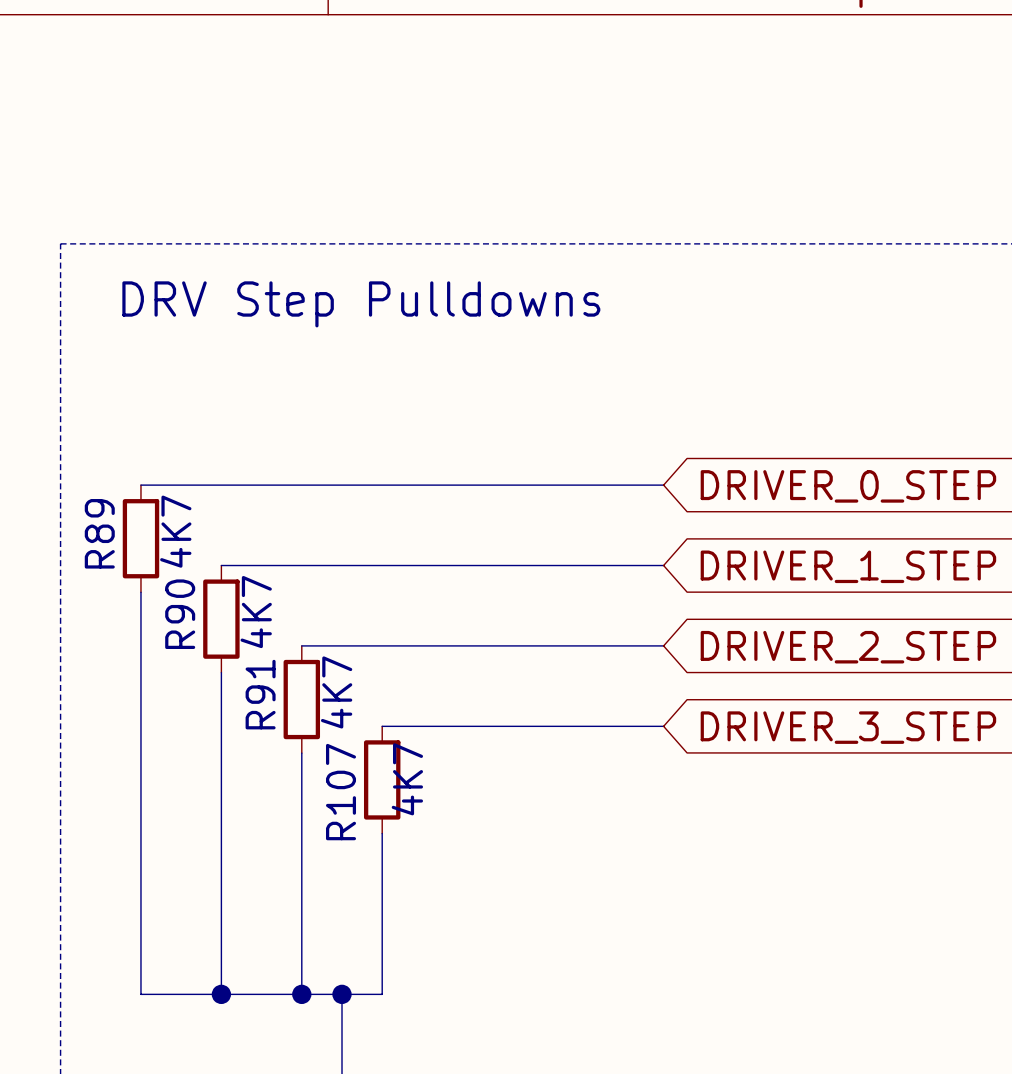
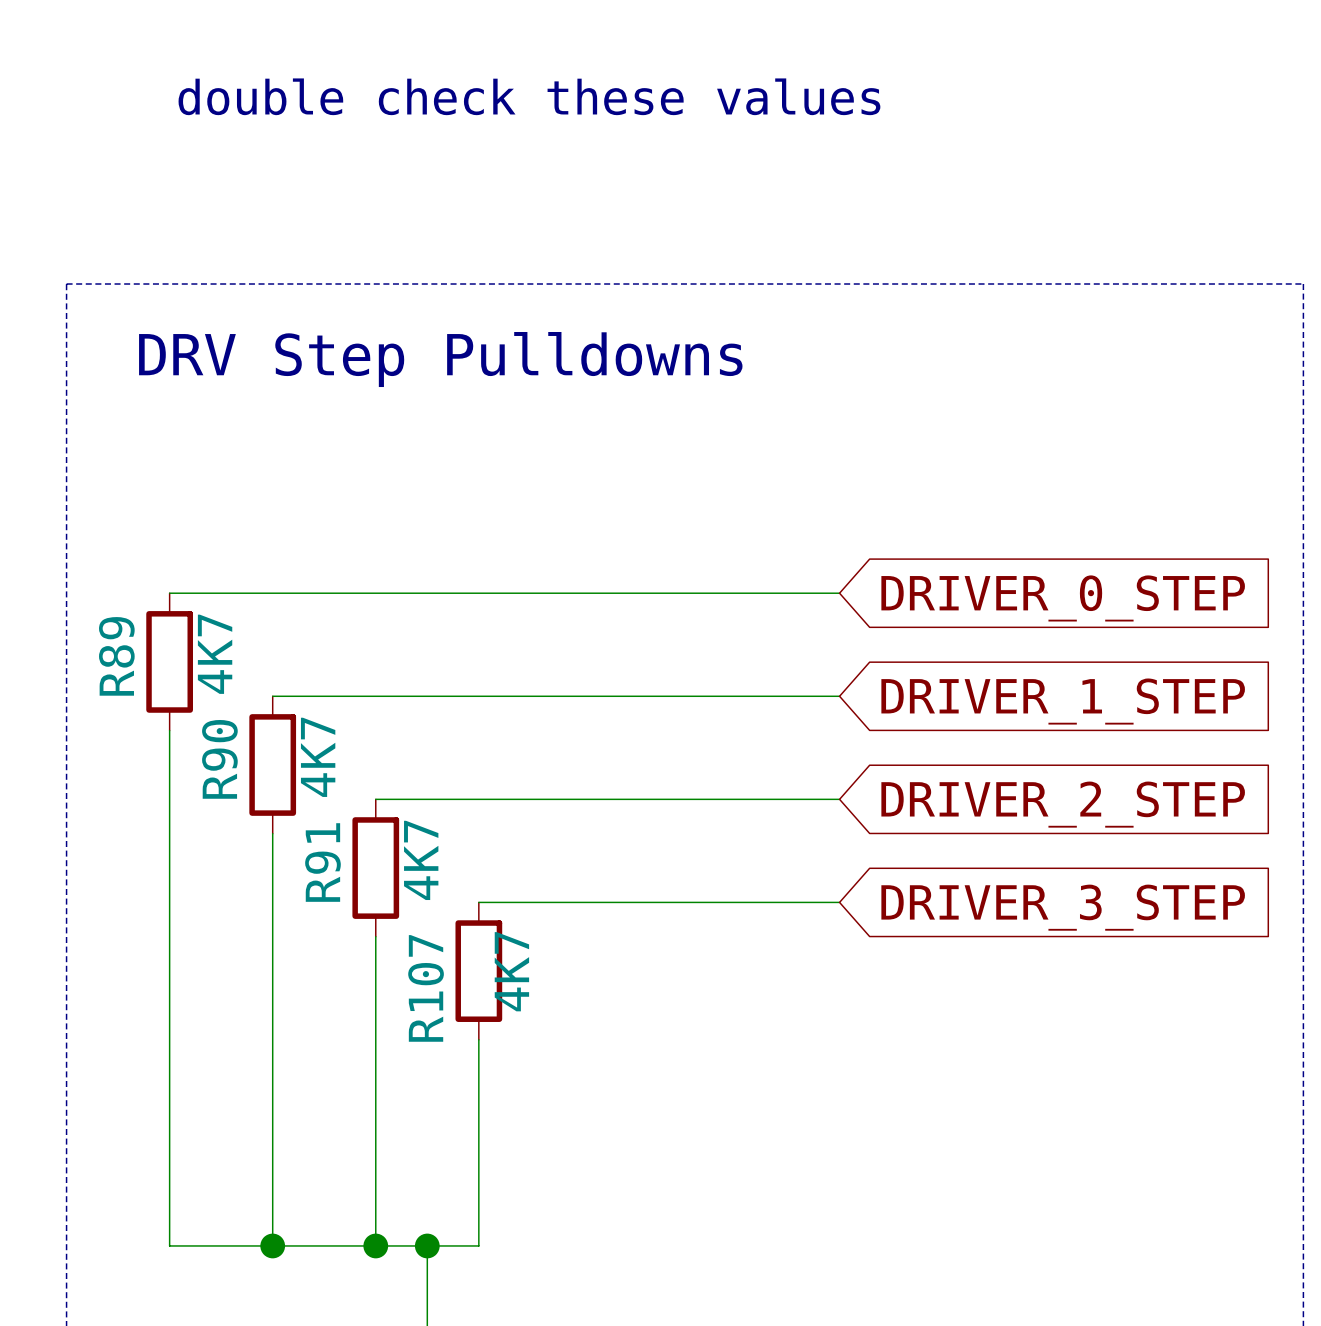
text: none -> double check these values (529, 96)

